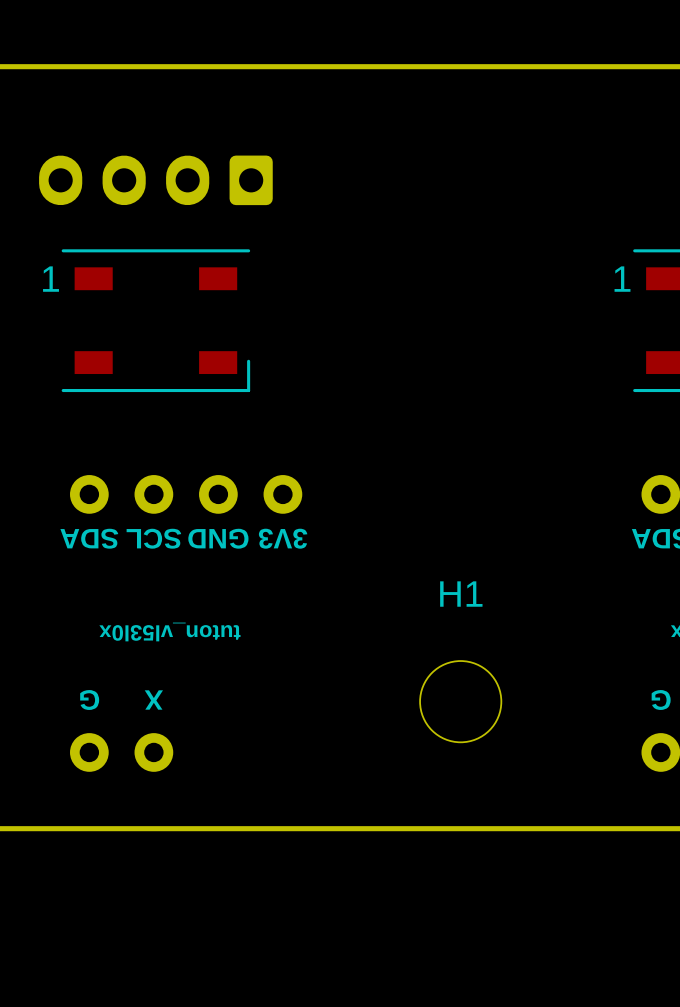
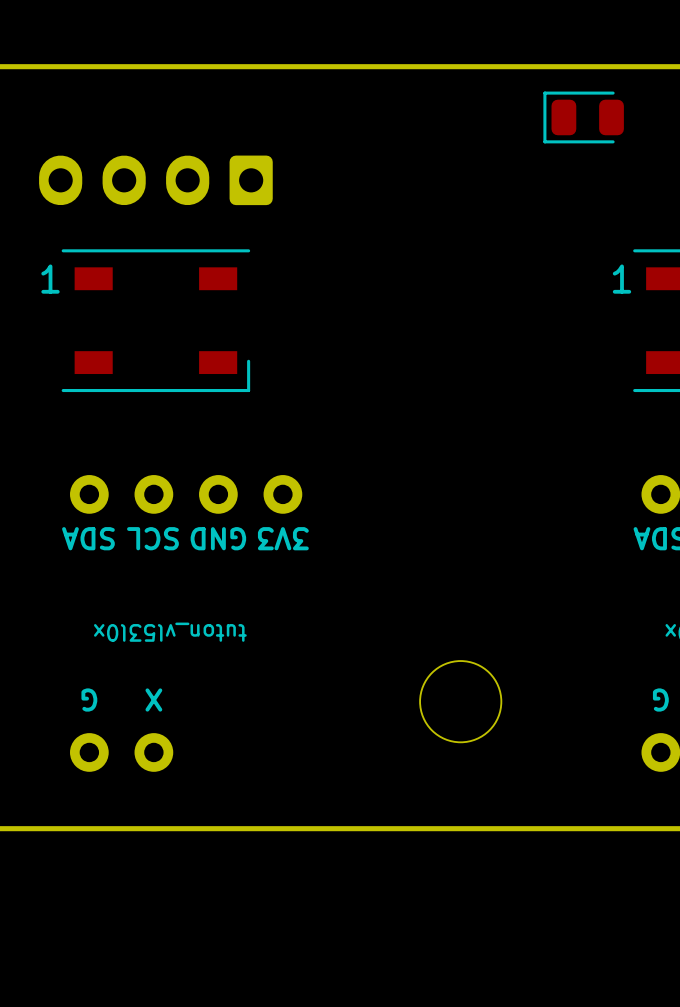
part: none -> (583, 117)
H1 name: H1 (461, 594) -> none

